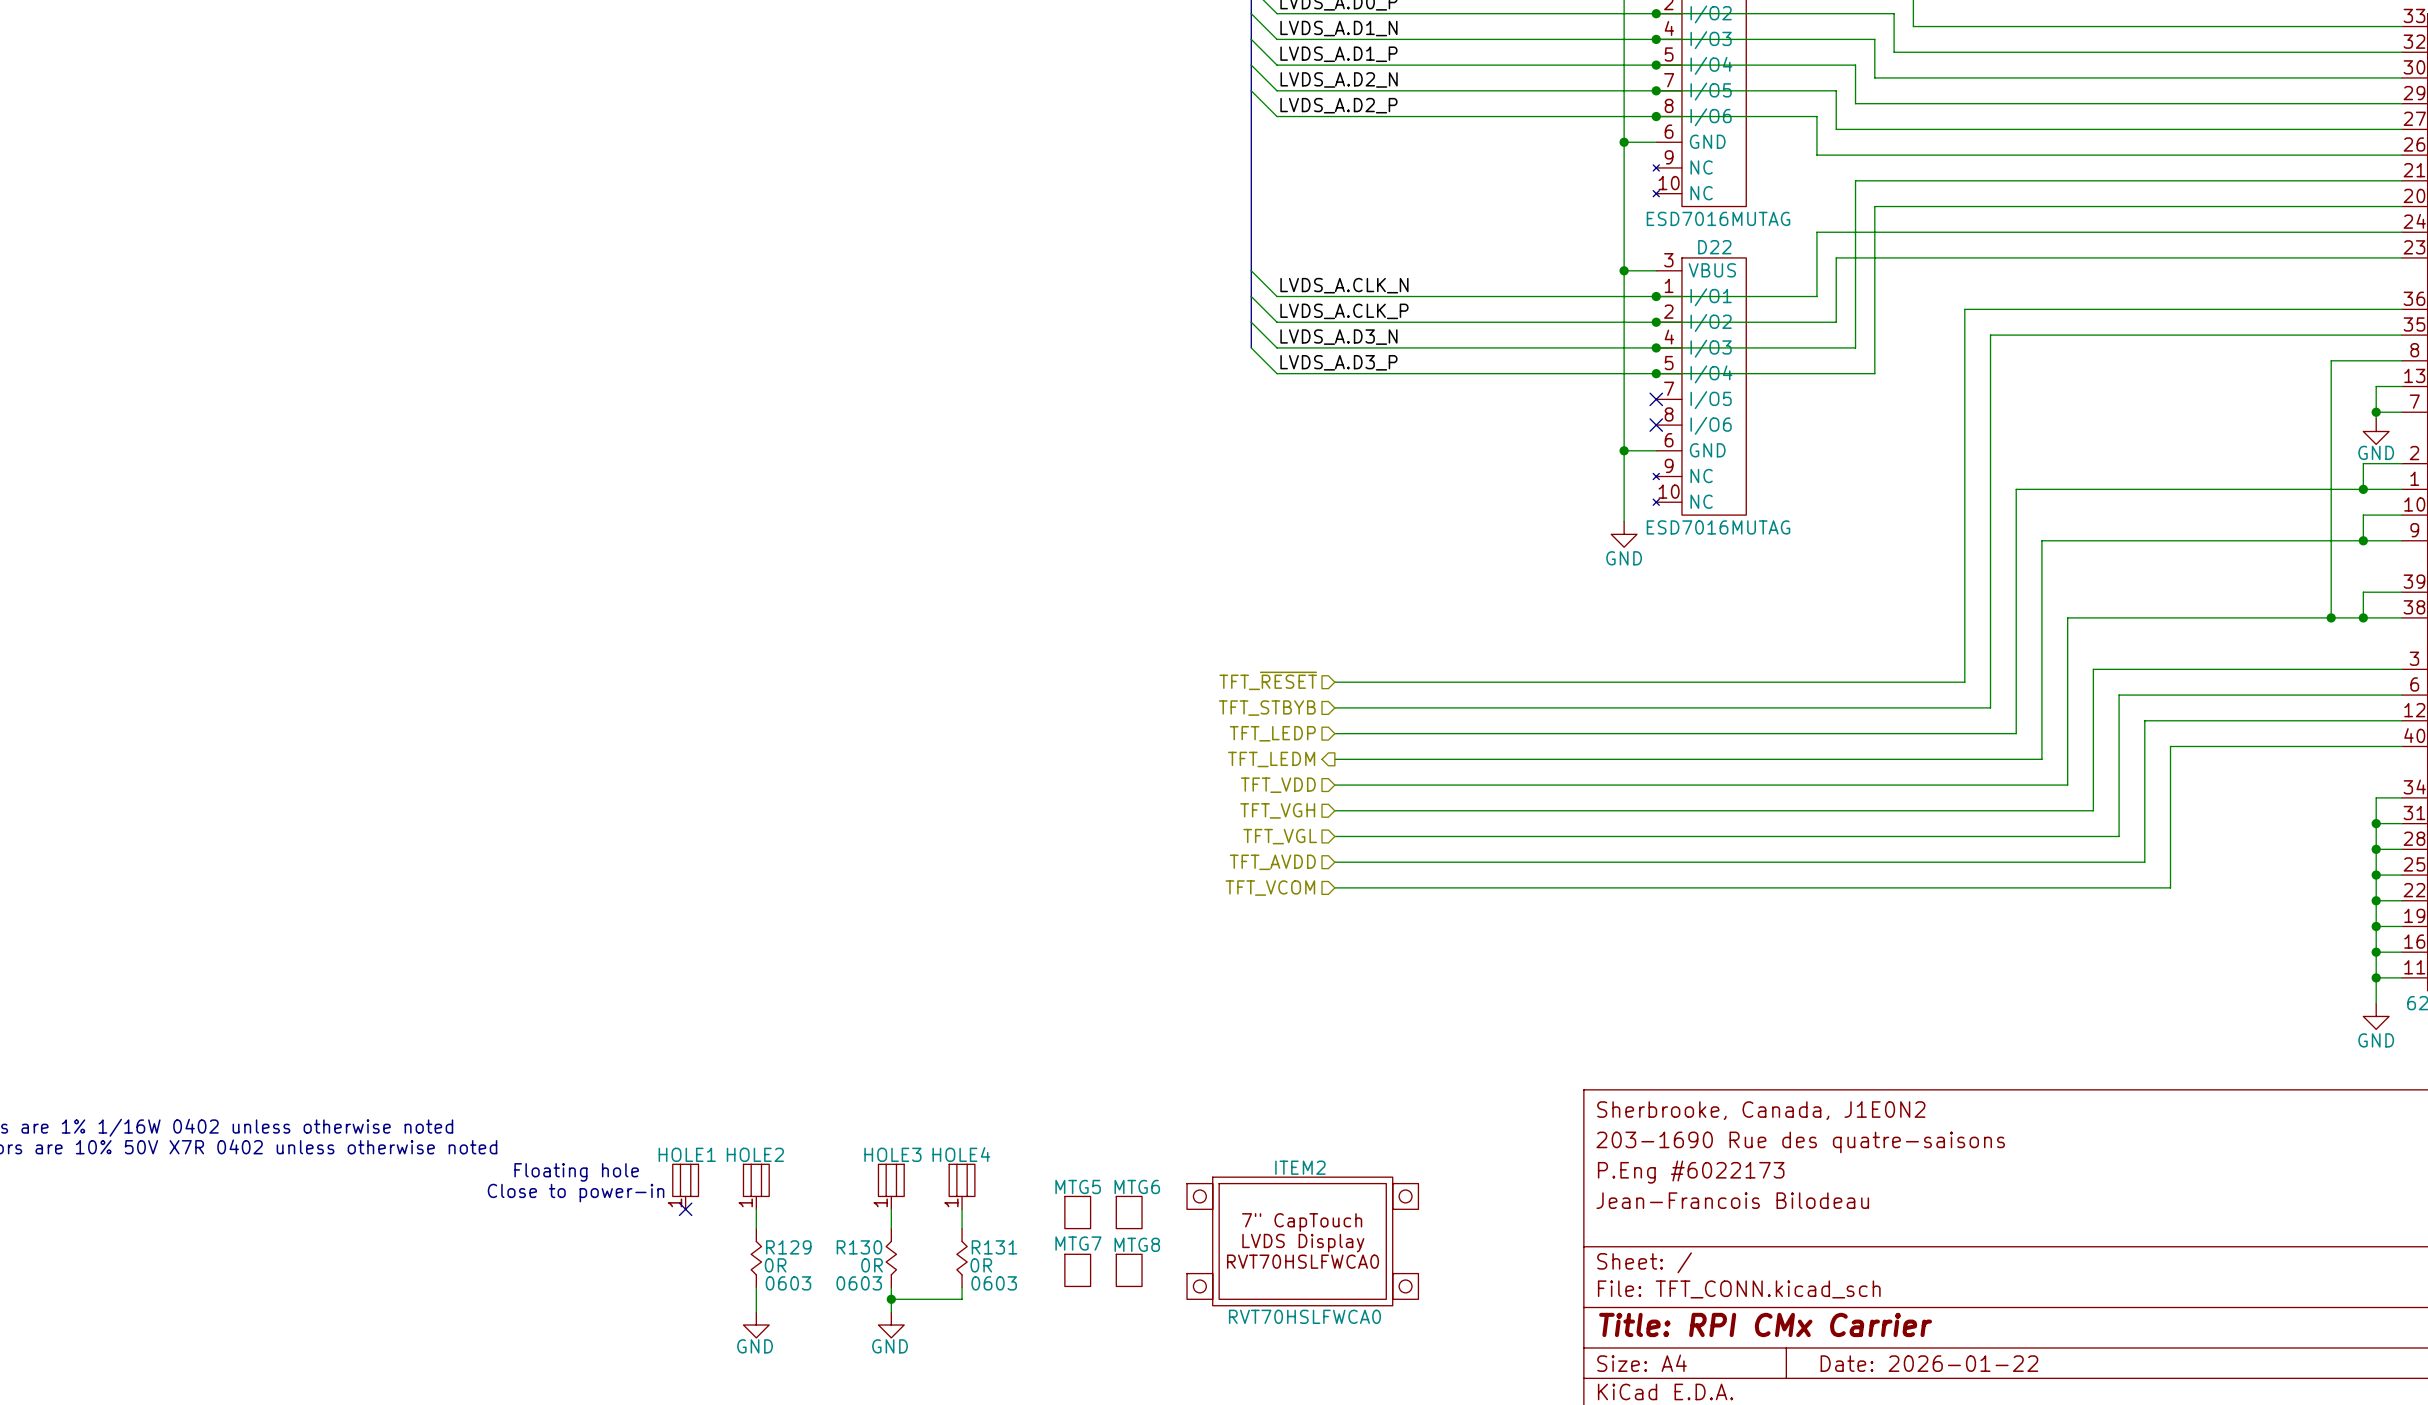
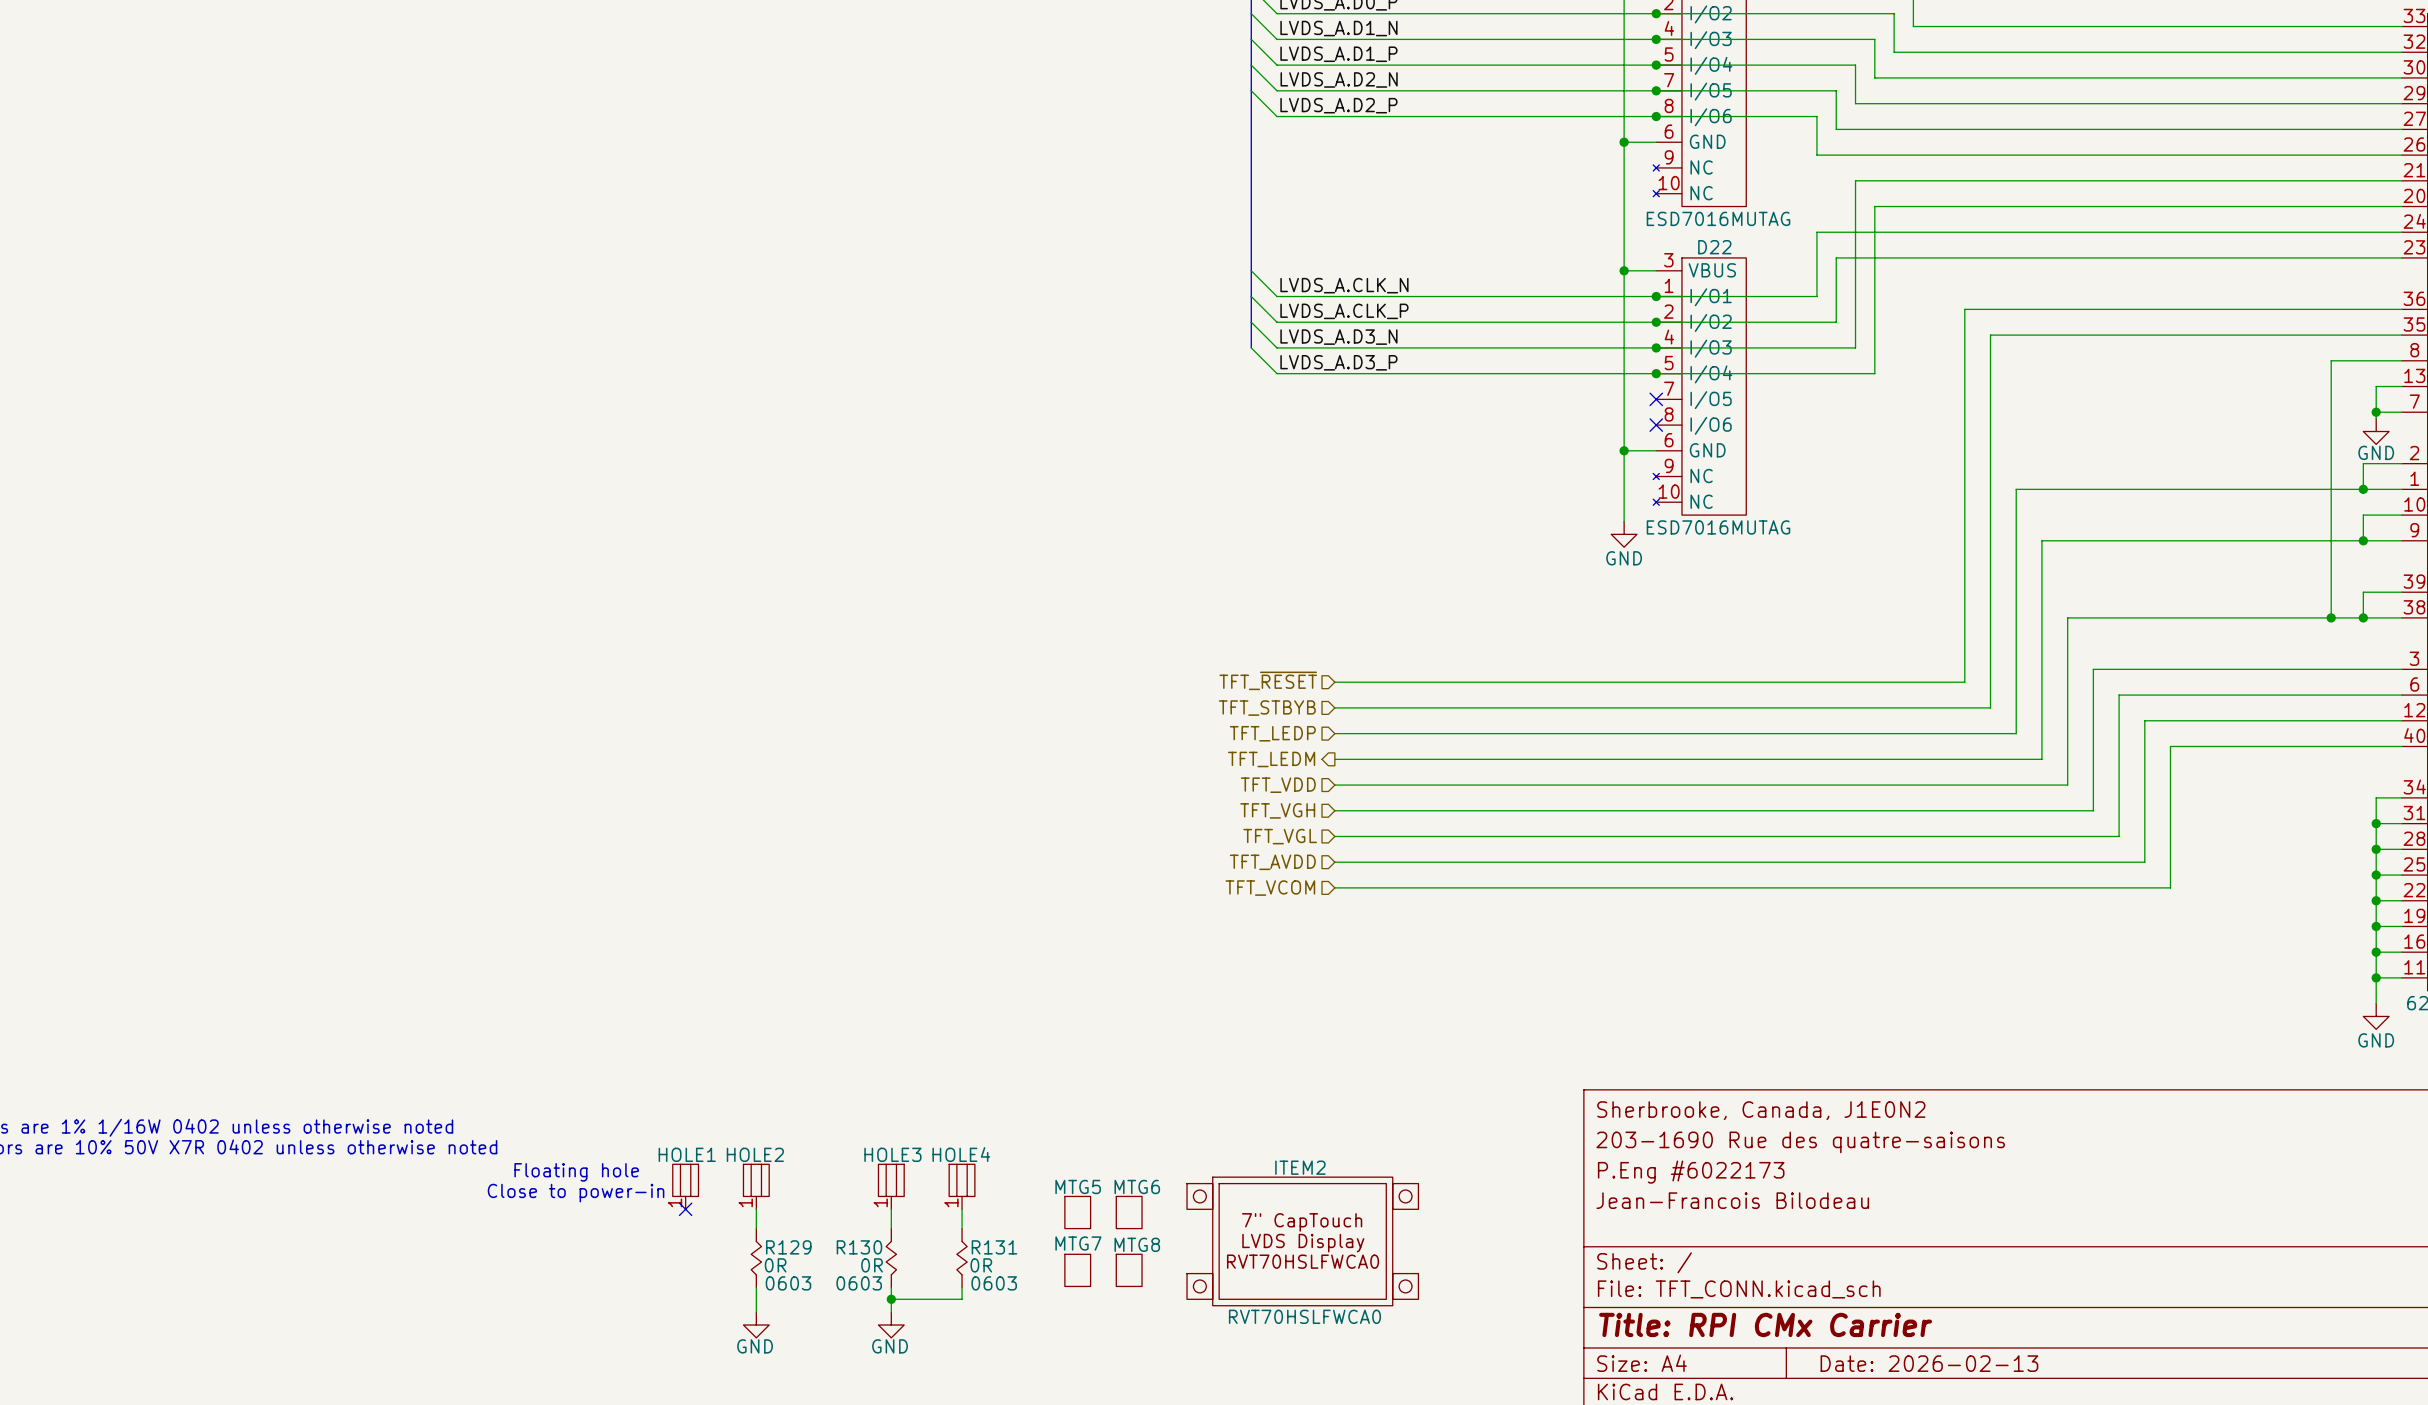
title block: Date: 2026-01-22 (1929, 1363) -> Date: 2026-02-13 (1929, 1363)

